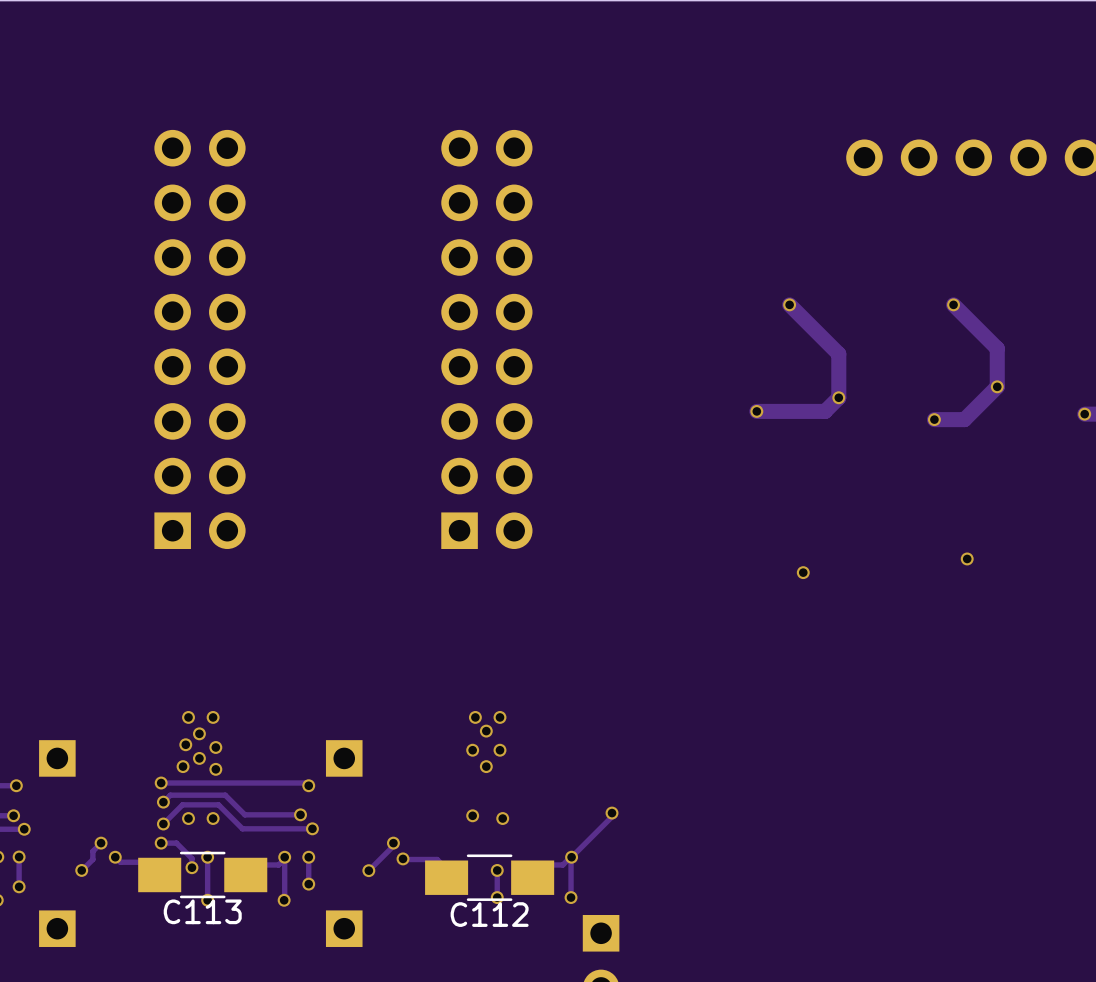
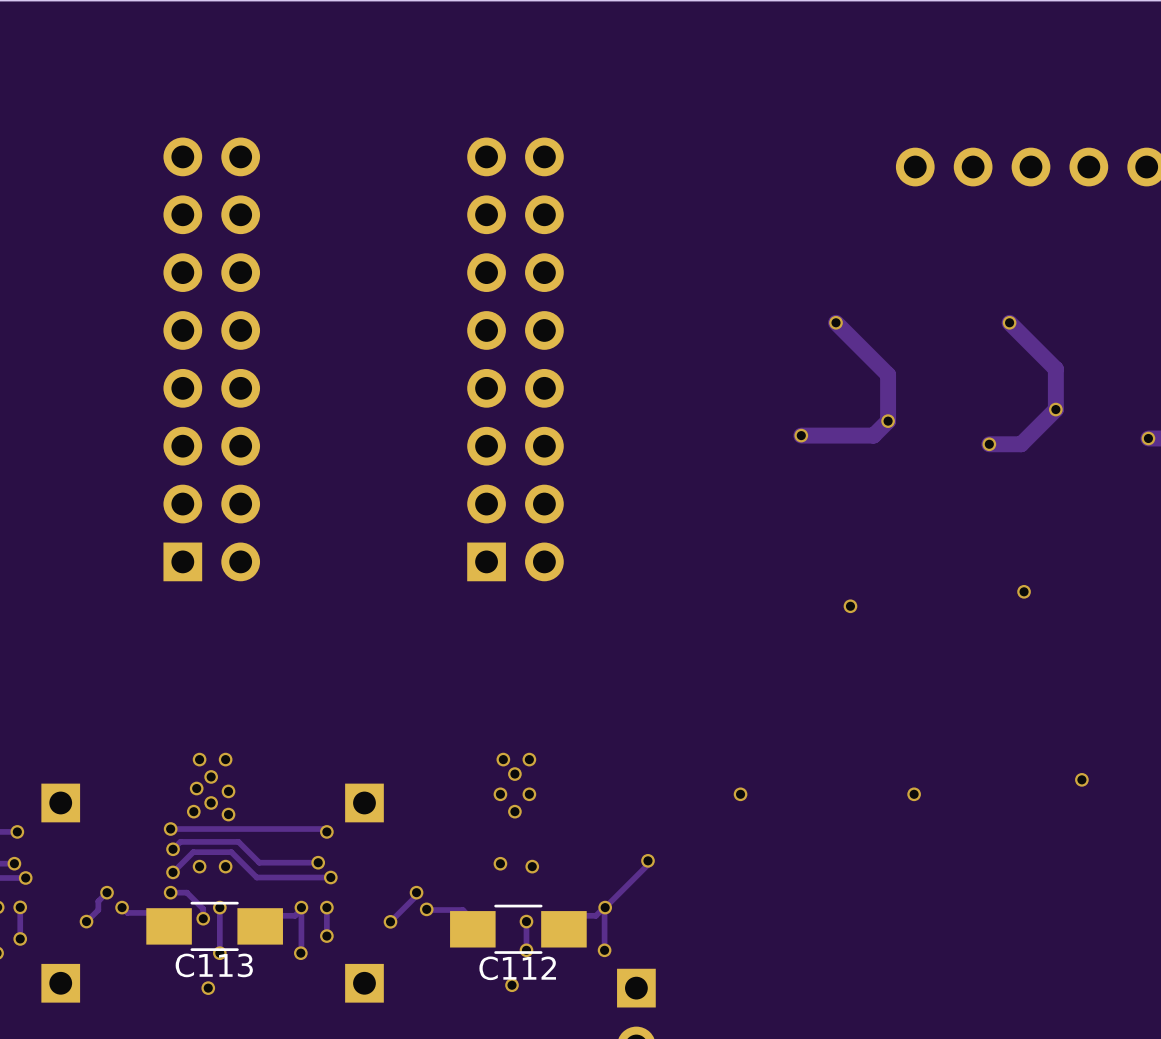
via: none -> (1081, 779)
via: none -> (740, 794)
via: none -> (914, 794)
via: none -> (512, 985)
via: none -> (208, 988)

